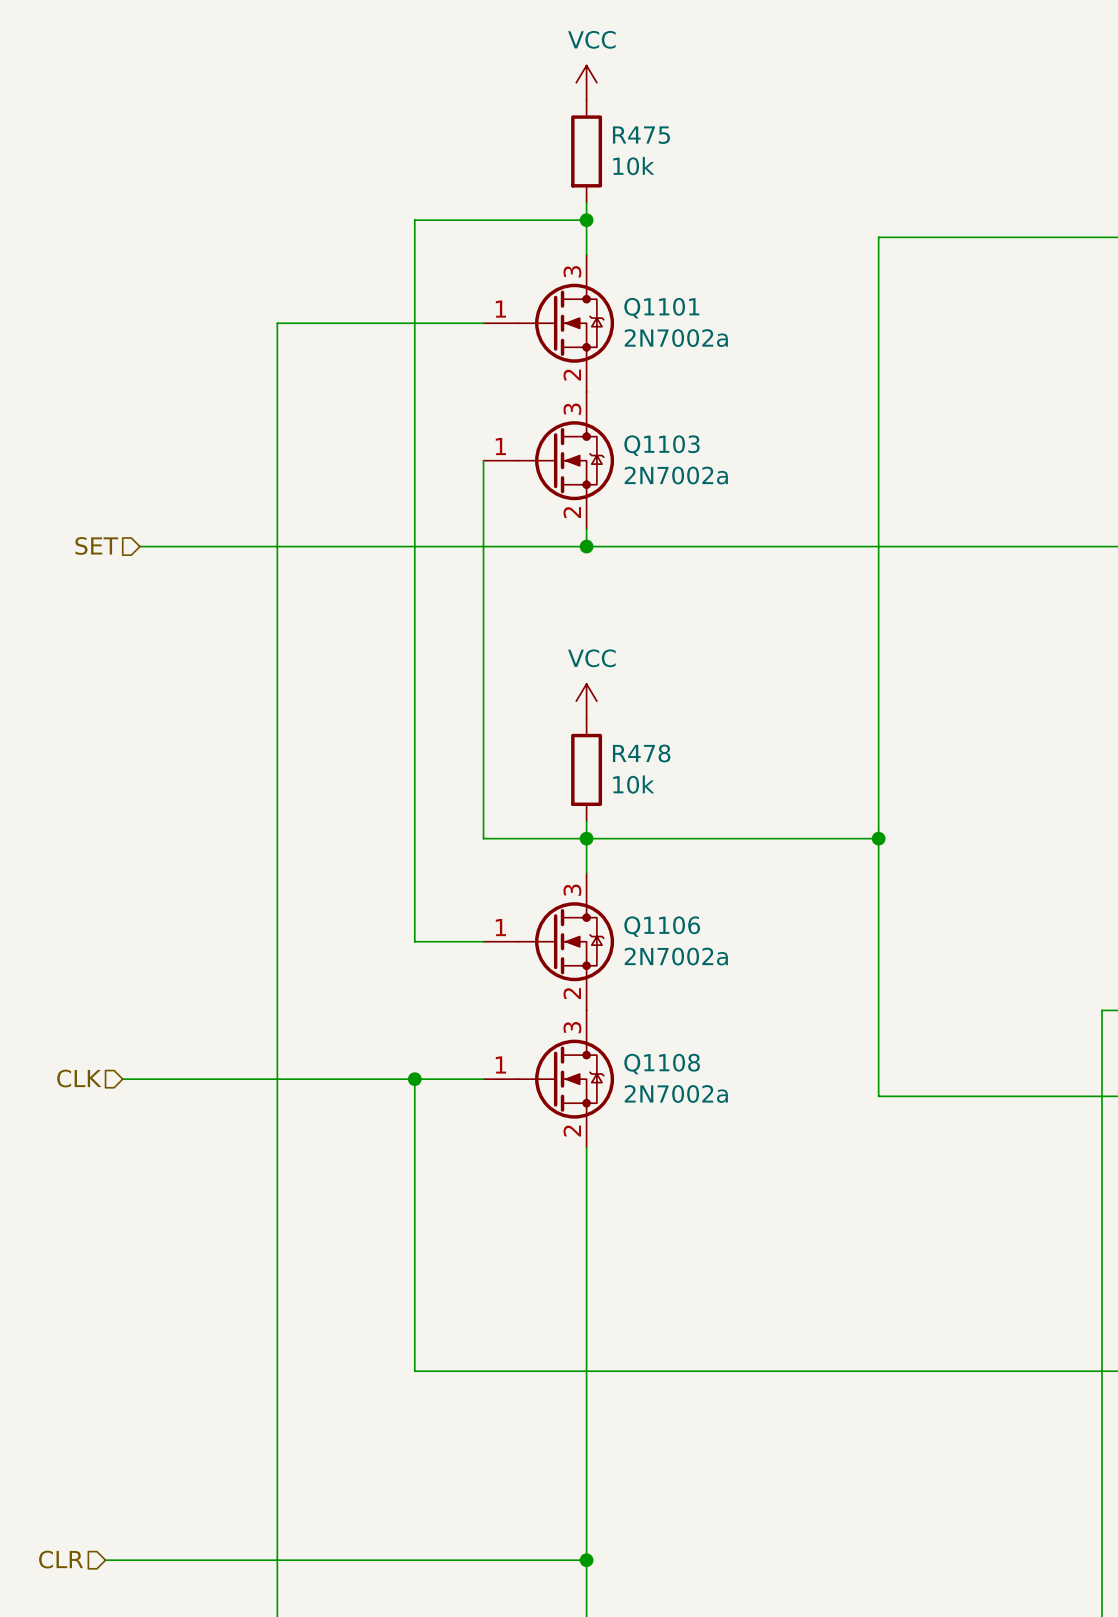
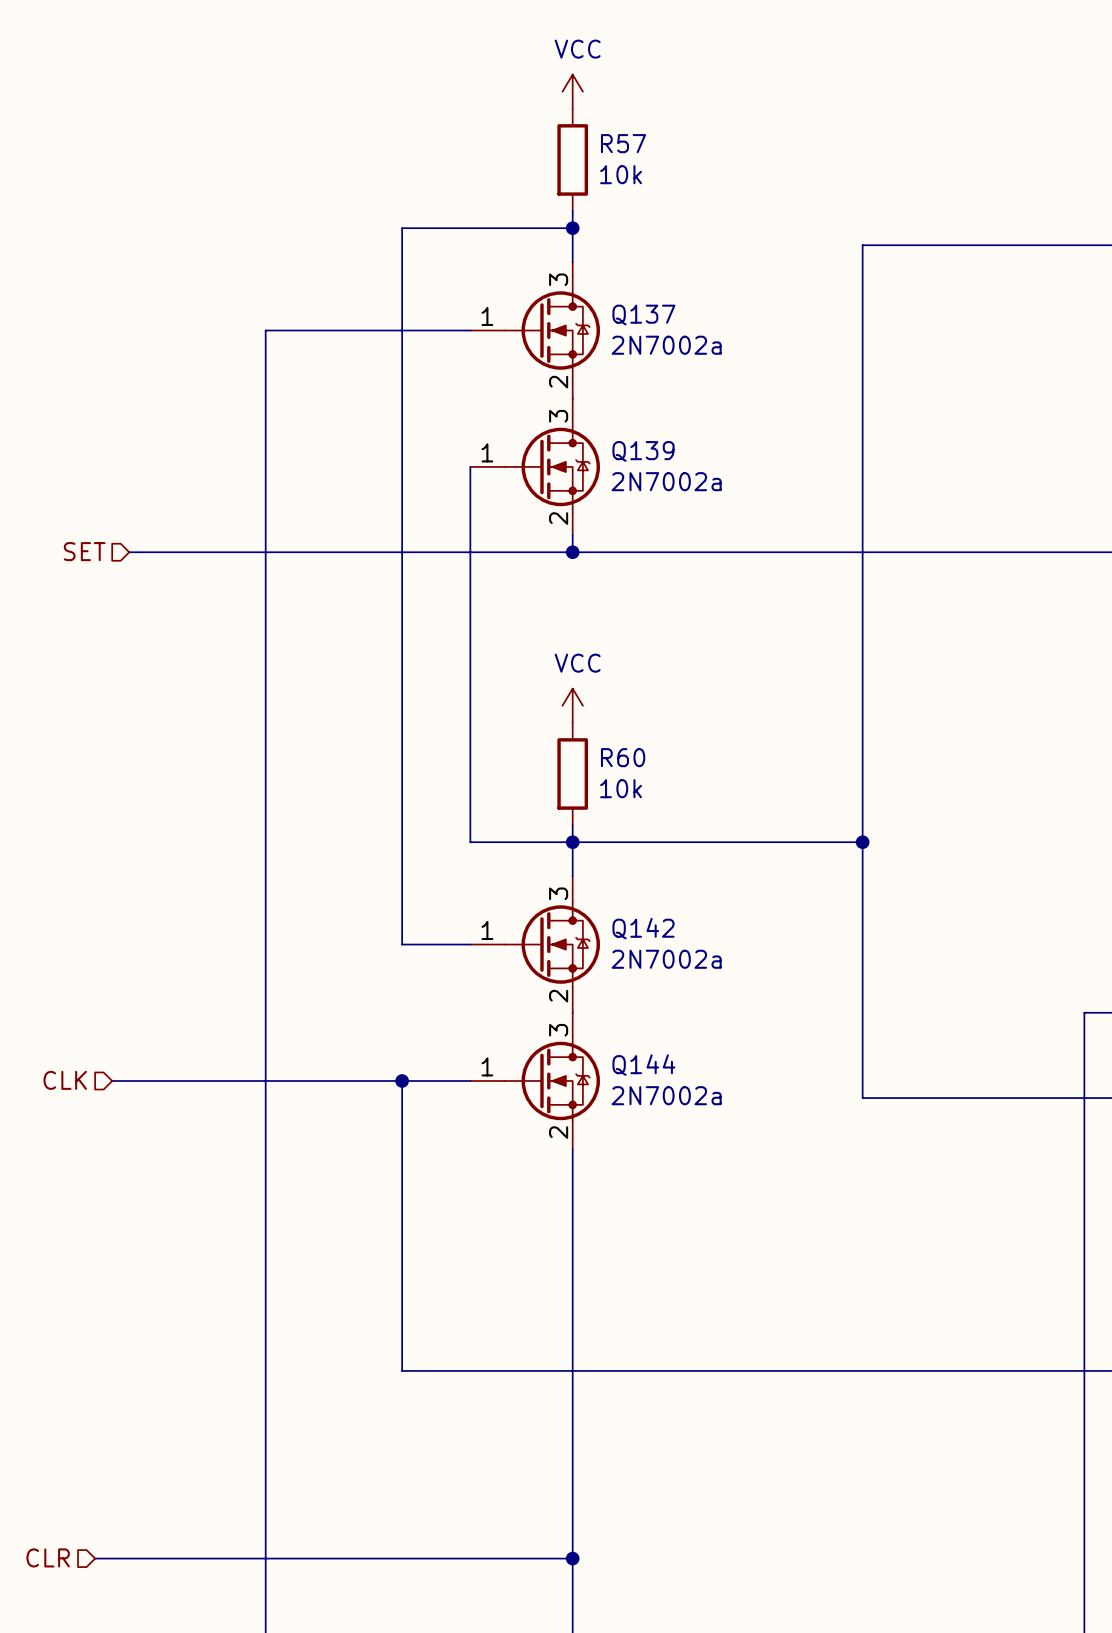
R475 name: R475 (641, 135) -> R57 (623, 143)
Q1101 name: Q1101 (661, 308) -> Q137 (643, 315)
Q1103 name: Q1103 (661, 445) -> Q139 (643, 451)
R478 name: R478 (641, 753) -> R60 (623, 757)
Q1106 name: Q1106 (662, 926) -> Q142 (643, 928)
Q1108 name: Q1108 (662, 1064) -> Q144 (643, 1065)

